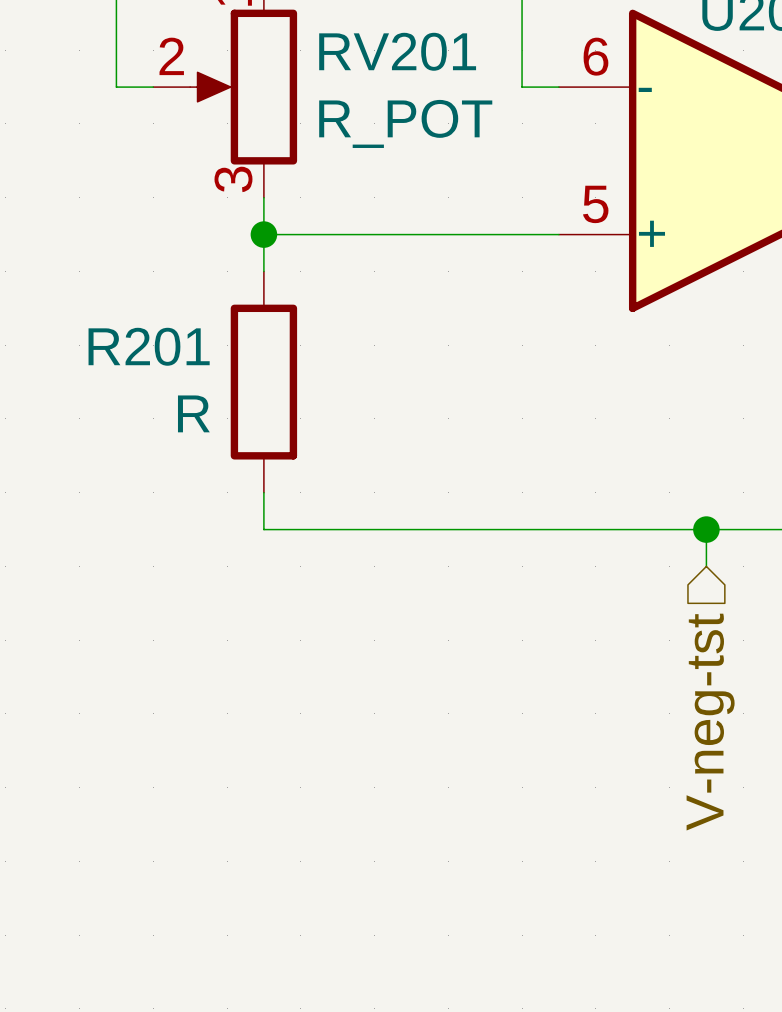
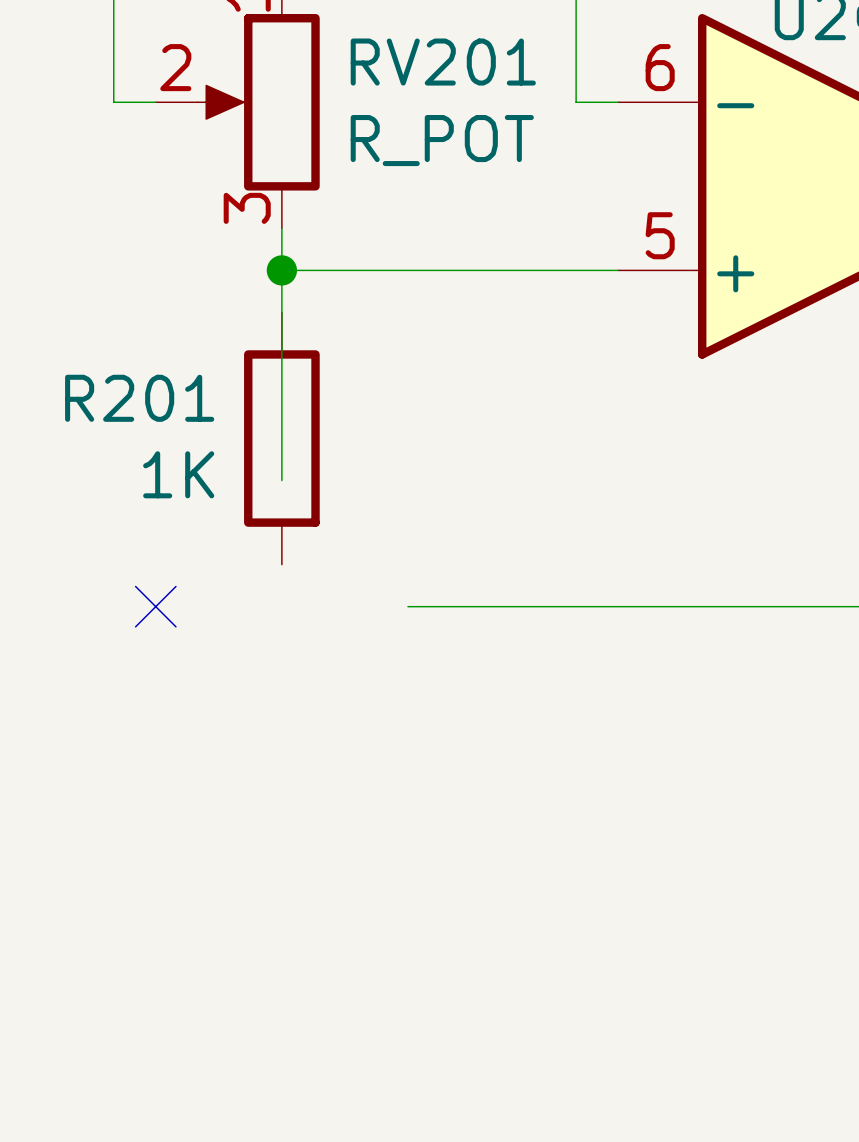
wire: none -> (281, 312) (281, 480)
R201 value: R (193, 413) -> 1K (178, 474)
wire: (263, 492) (263, 529) (374, 529) -> none
no-connect mark: none -> (155, 606)
wire: (706, 529) (706, 566) -> none
junction: (706, 529) -> none
hierarchical label: V-neg-tst (710, 722) -> none

